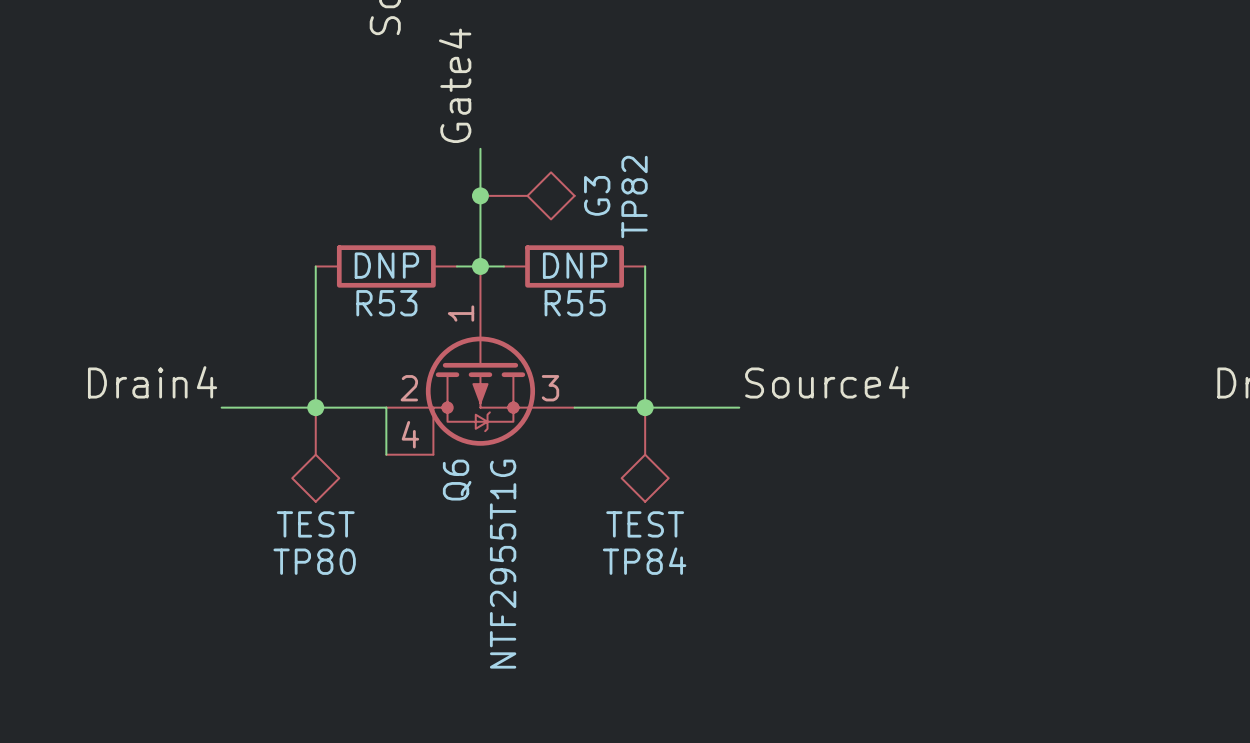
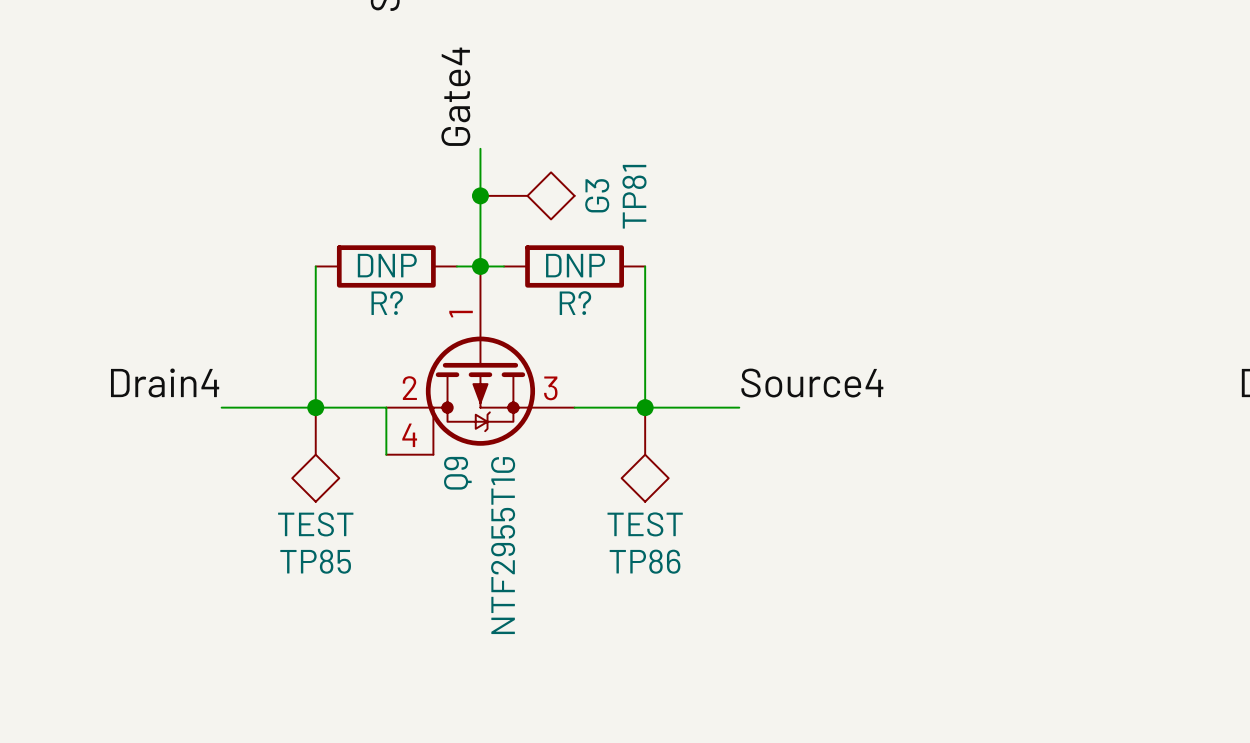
TP82 name: TP82 (634, 197) -> TP81 (634, 196)
R53 name: R53 (386, 303) -> R? (387, 303)
R55 name: R55 (575, 303) -> R? (575, 303)
Q6 name: Q6 (457, 480) -> Q9 (457, 473)
TP80 name: TP80 (314, 561) -> TP85 (315, 561)
TP84 name: TP84 (644, 561) -> TP86 (645, 561)

